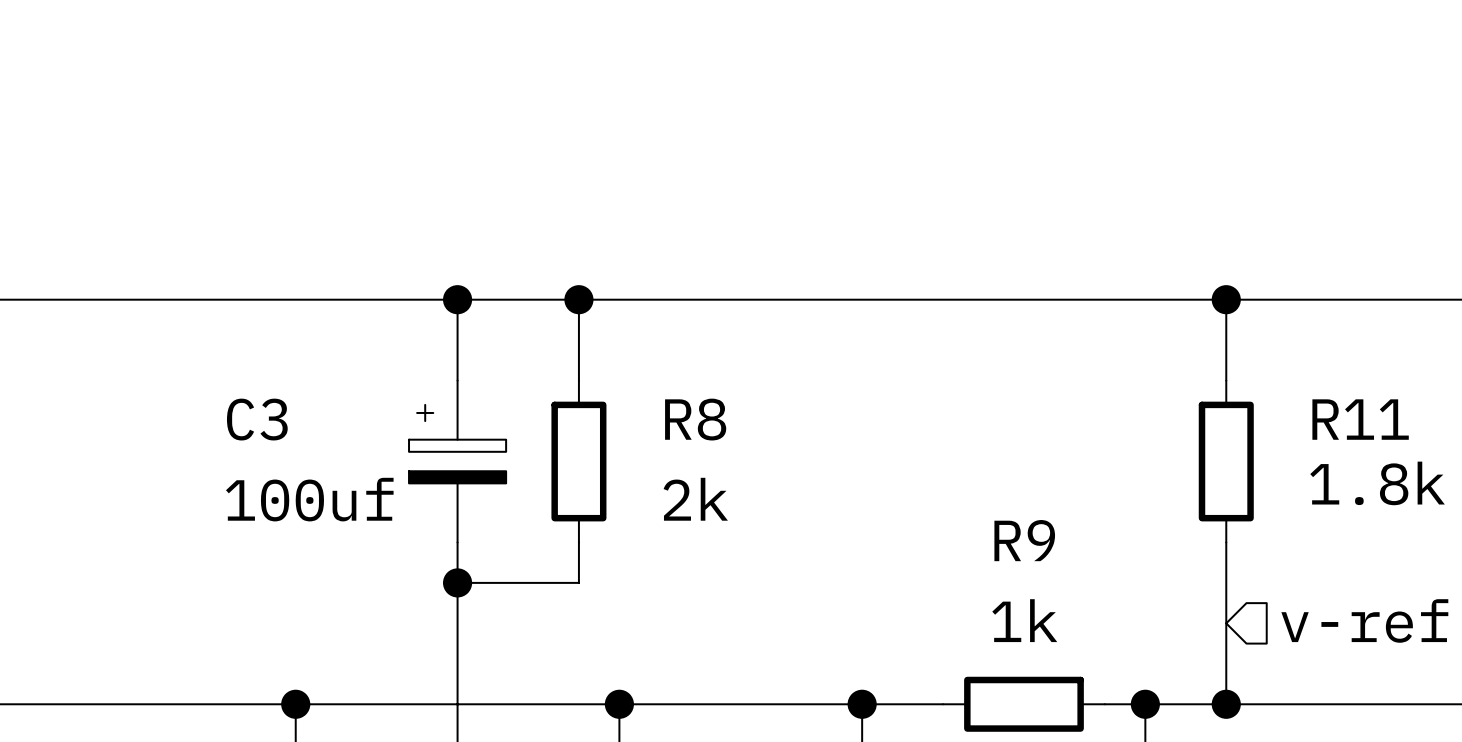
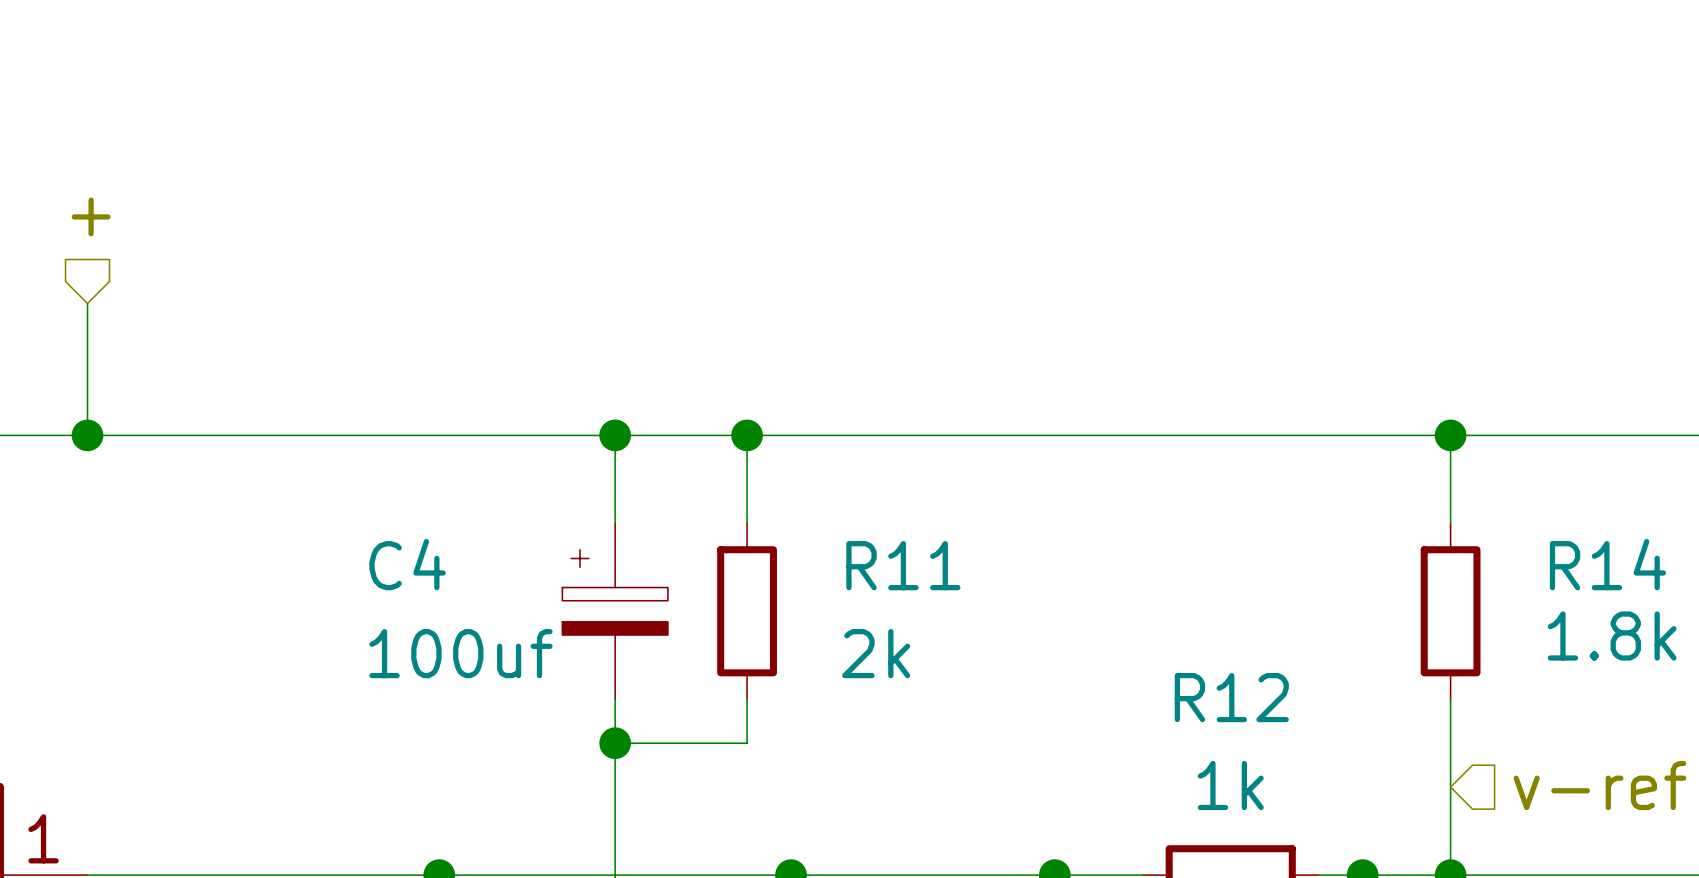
C3 name: C3 (257, 419) -> C4 (407, 564)
R8 name: R8 (695, 419) -> R11 (903, 565)
R11 name: R11 (1360, 419) -> R14 (1607, 564)
R9 name: R9 (1024, 540) -> R12 (1231, 697)

